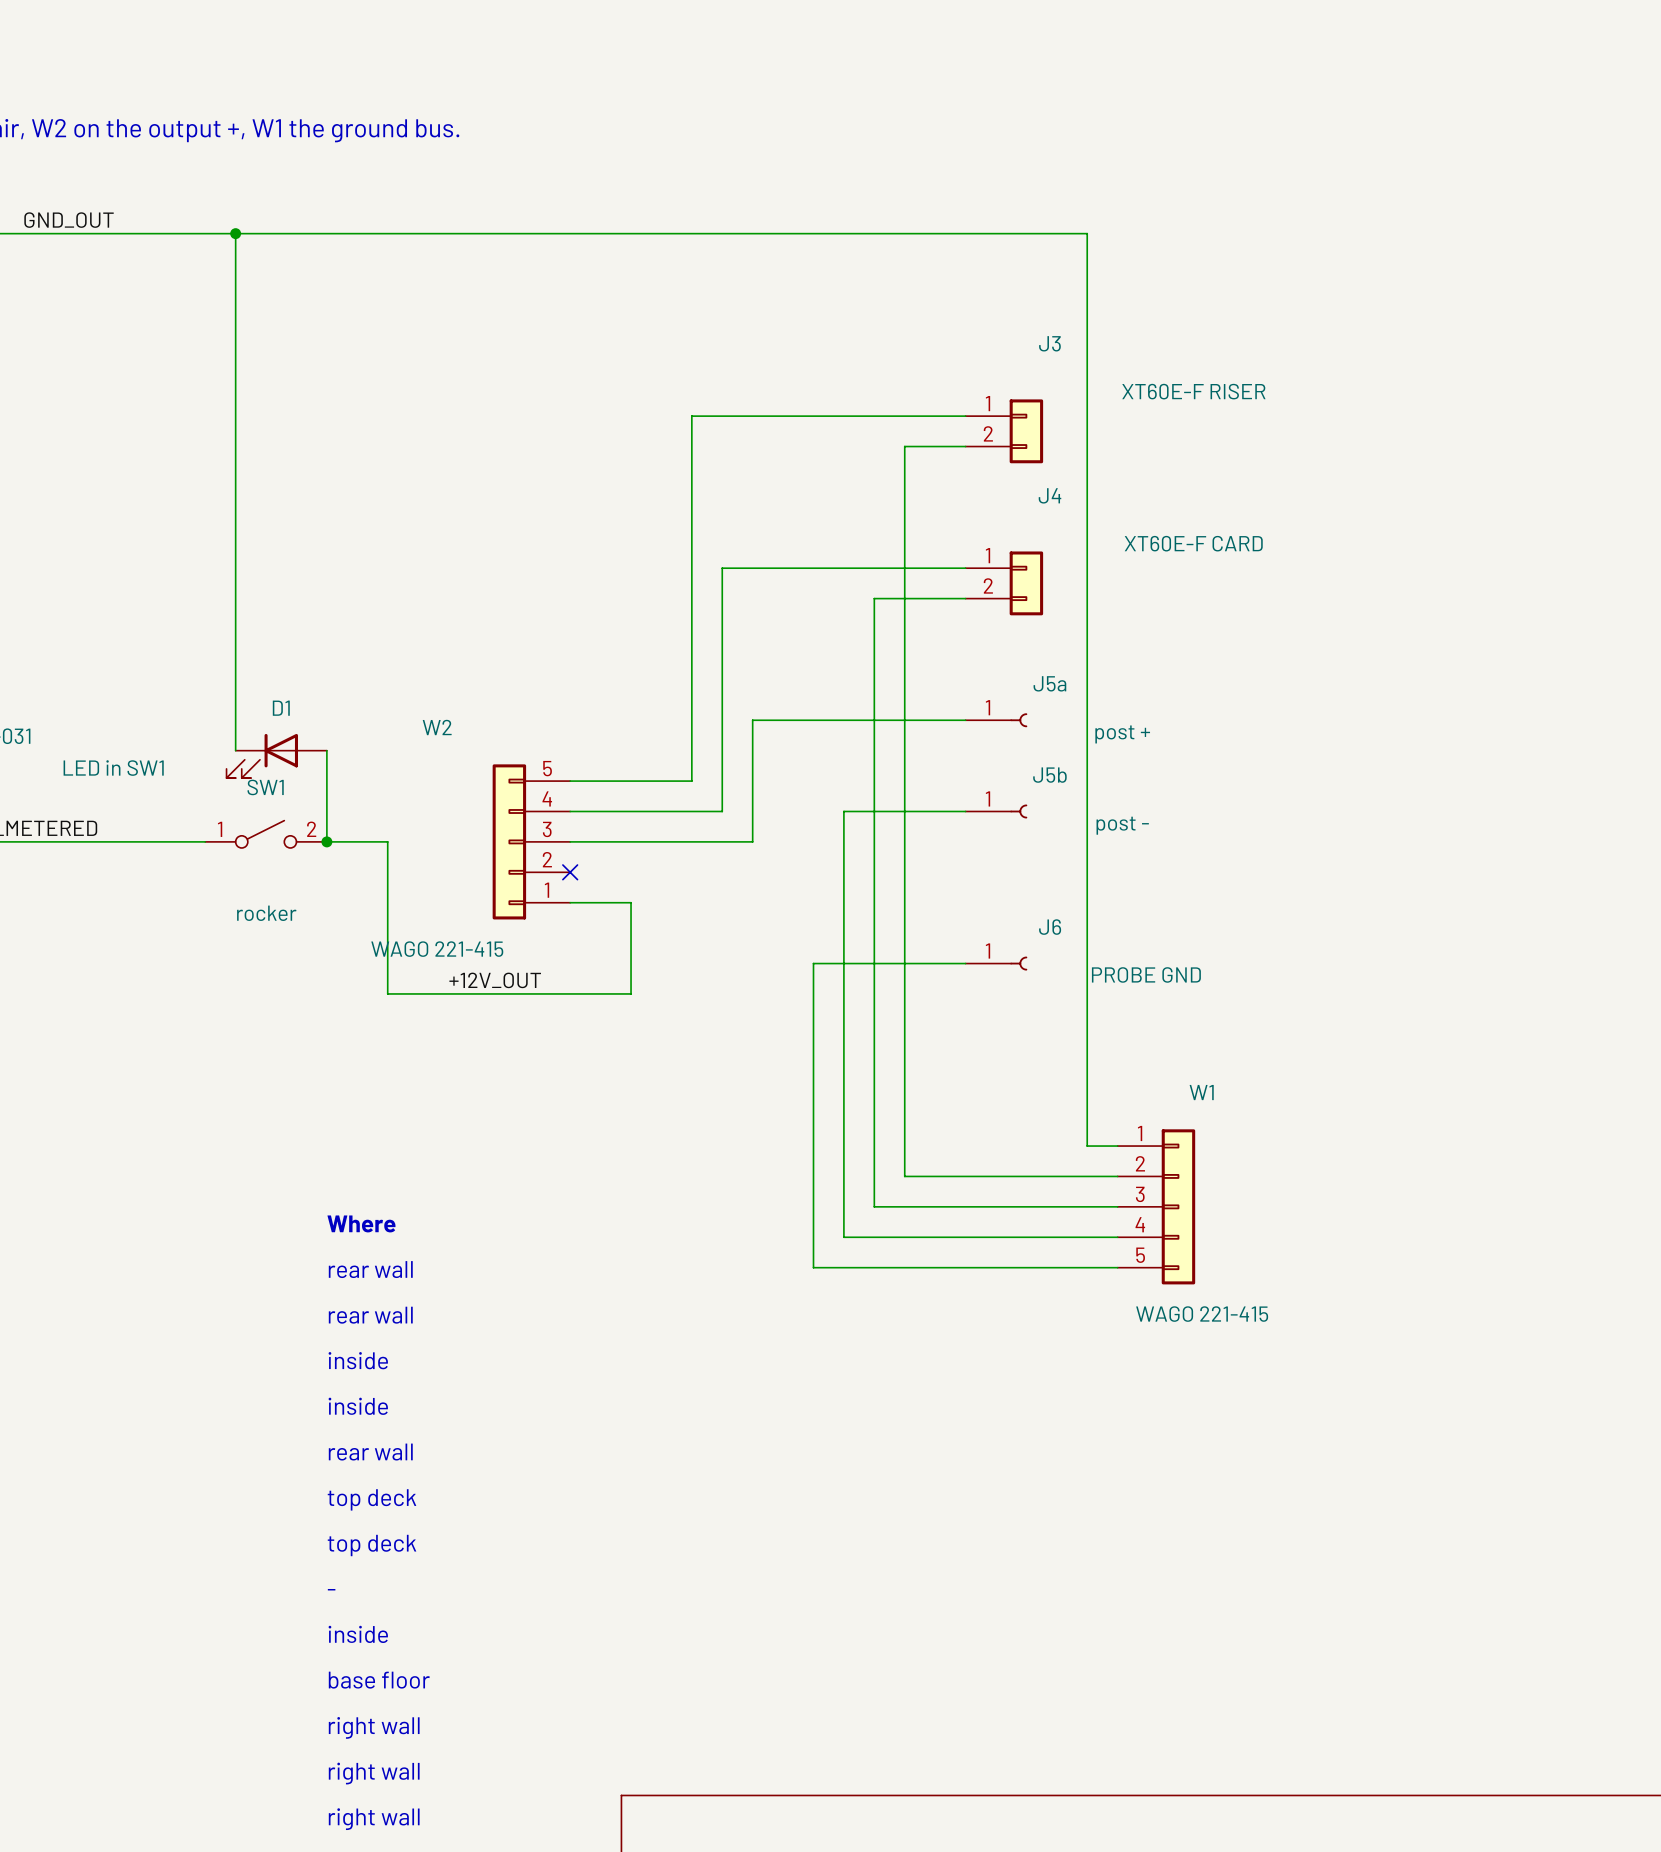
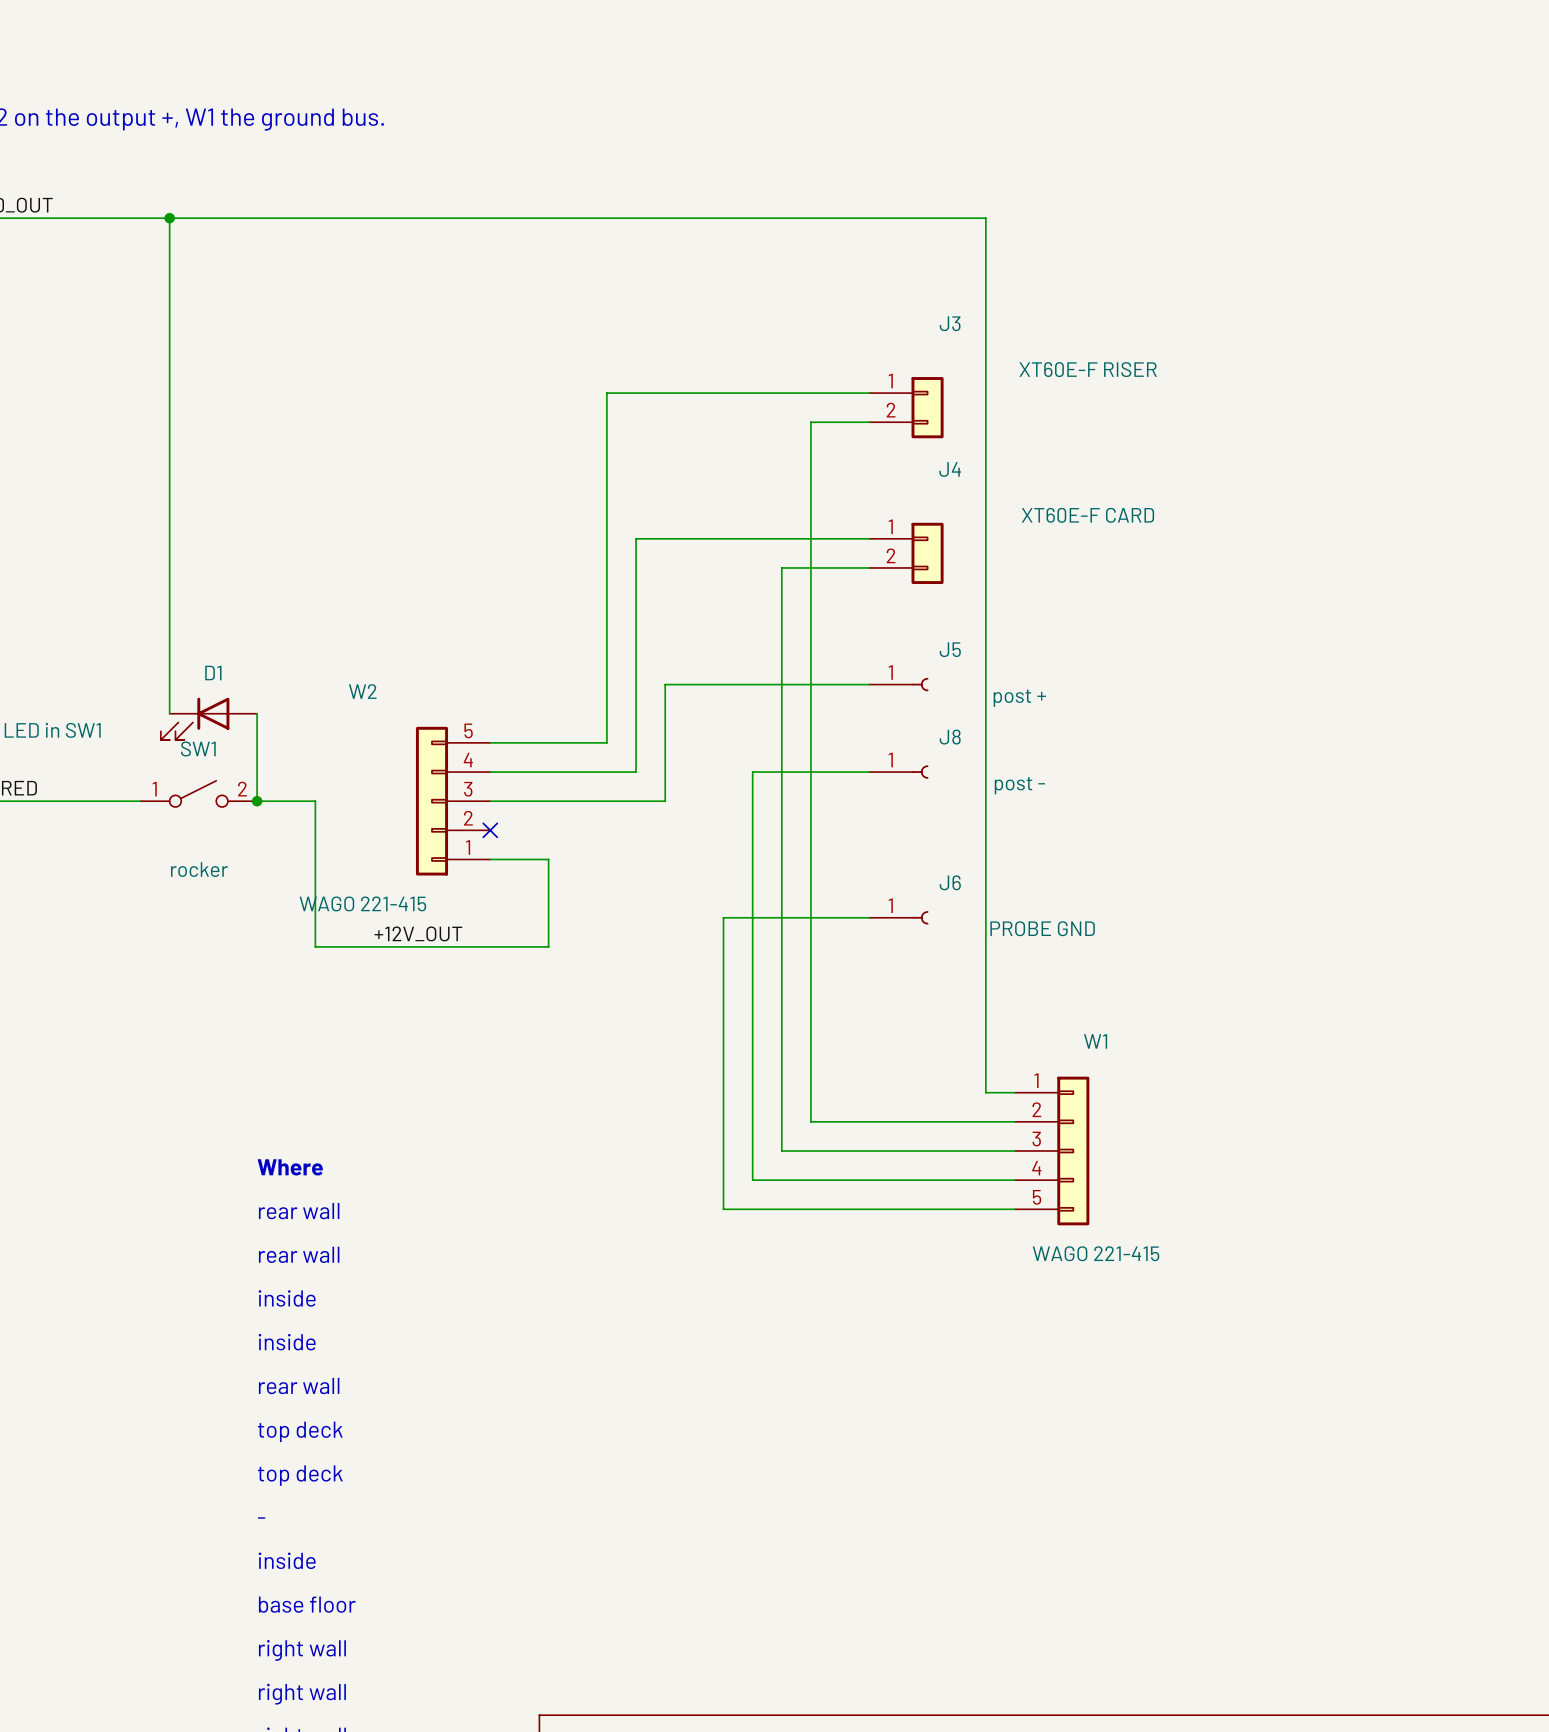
J5a name: J5a (1049, 683) -> J5 (950, 649)
J5b name: J5b (1049, 775) -> J8 (950, 737)

